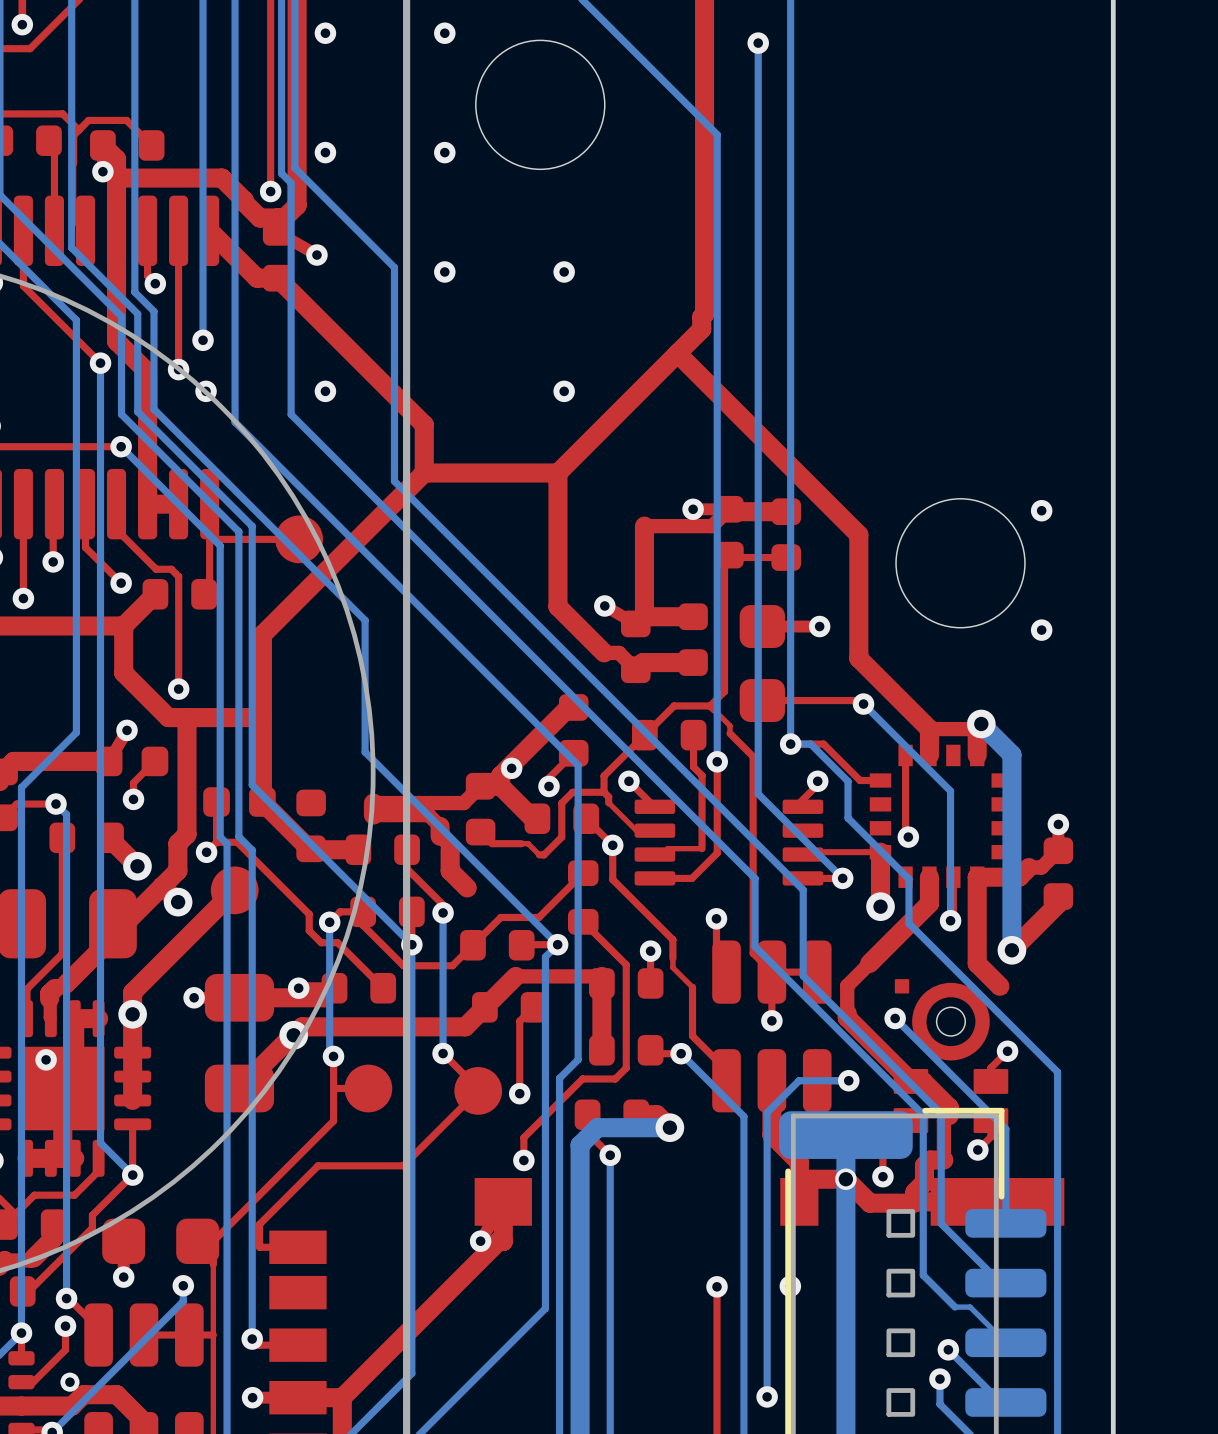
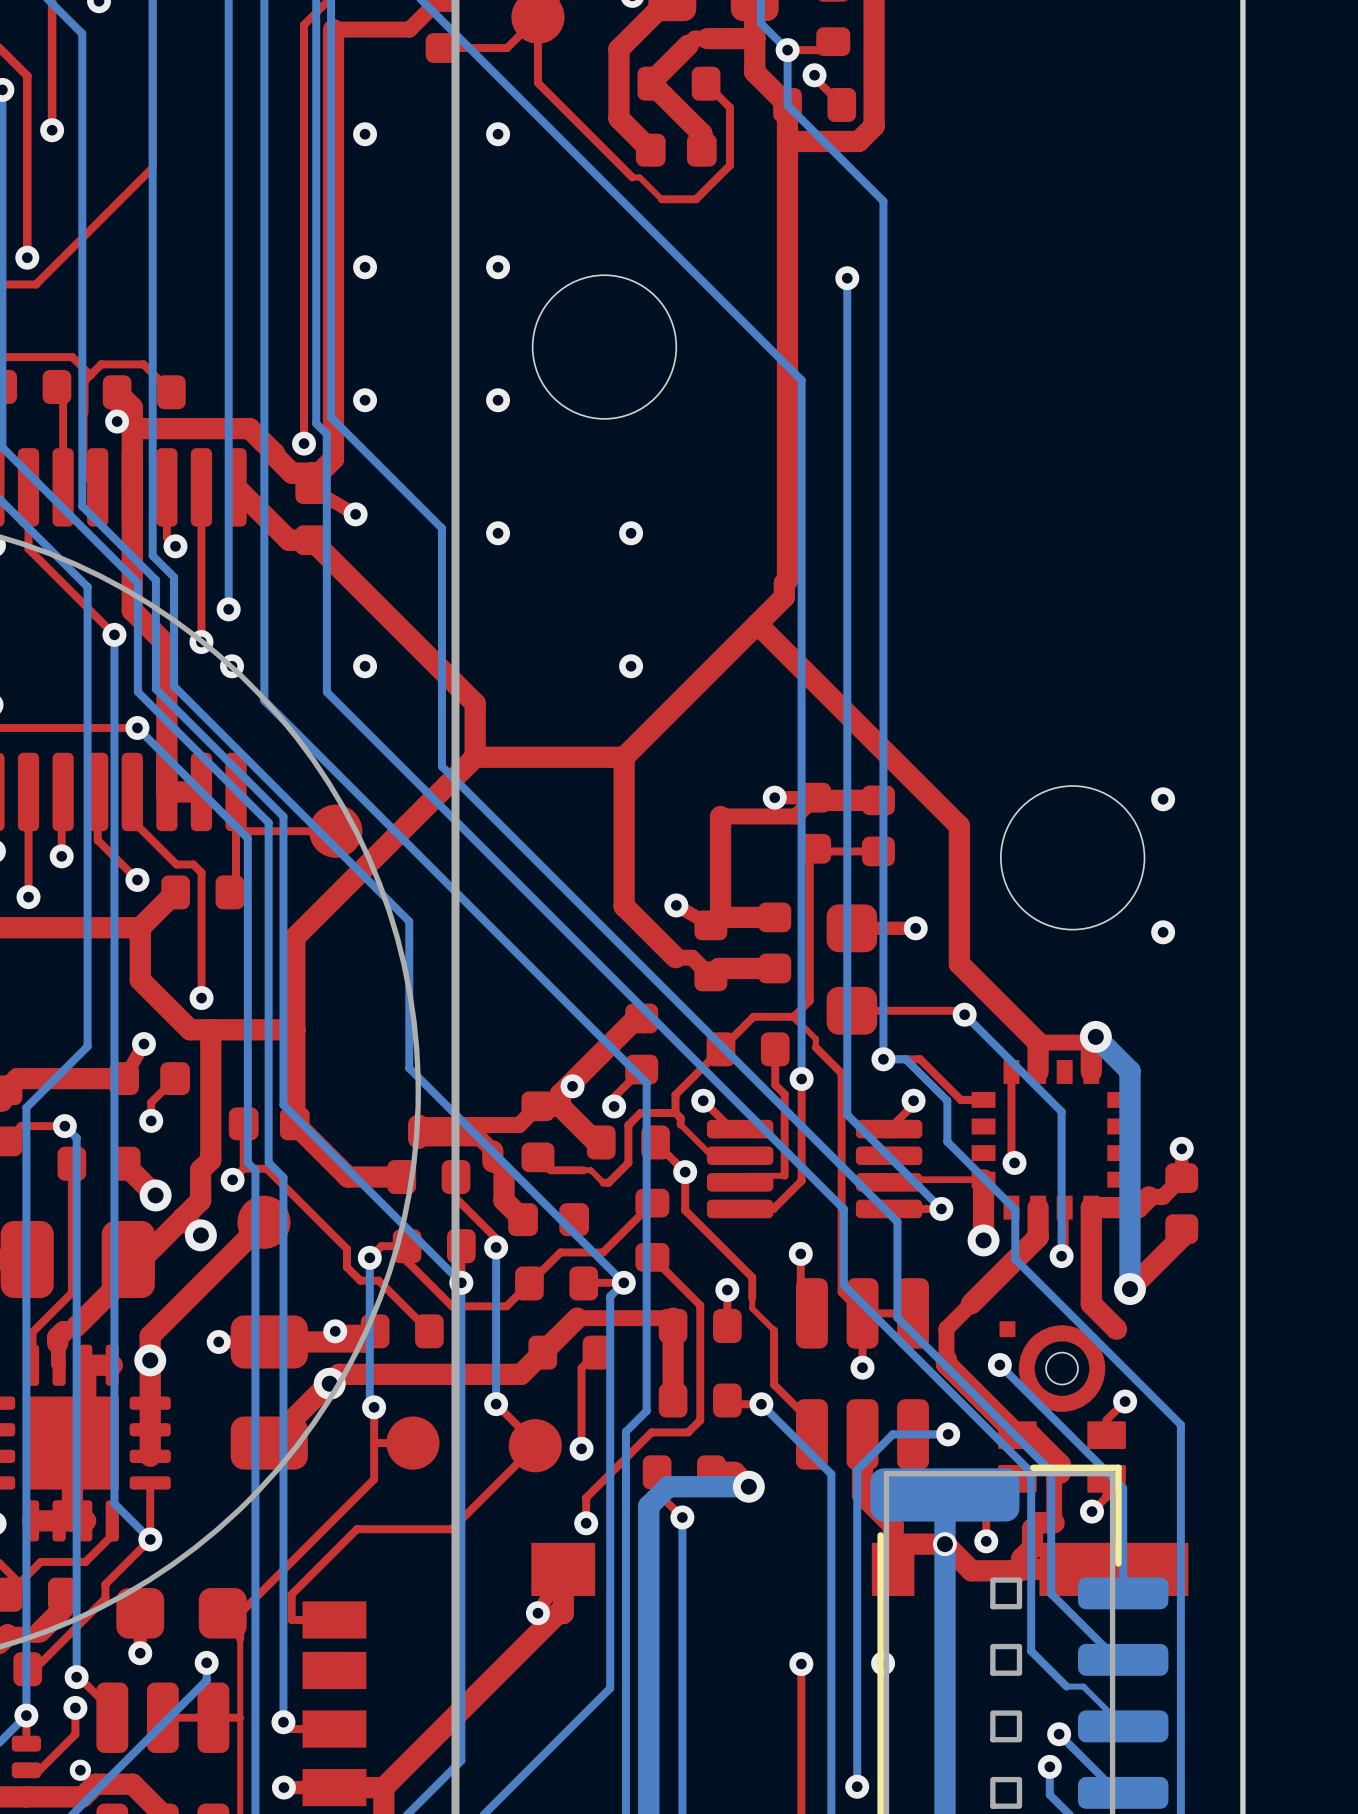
part footprint: [634, 799, 824, 886] -> [706, 1119, 923, 1219]
part rotation: 0° (311, 825) -> 90° clockwise (548, 1219)
part position: (311, 825) -> (548, 1219)
via: (46, 1059) -> none

